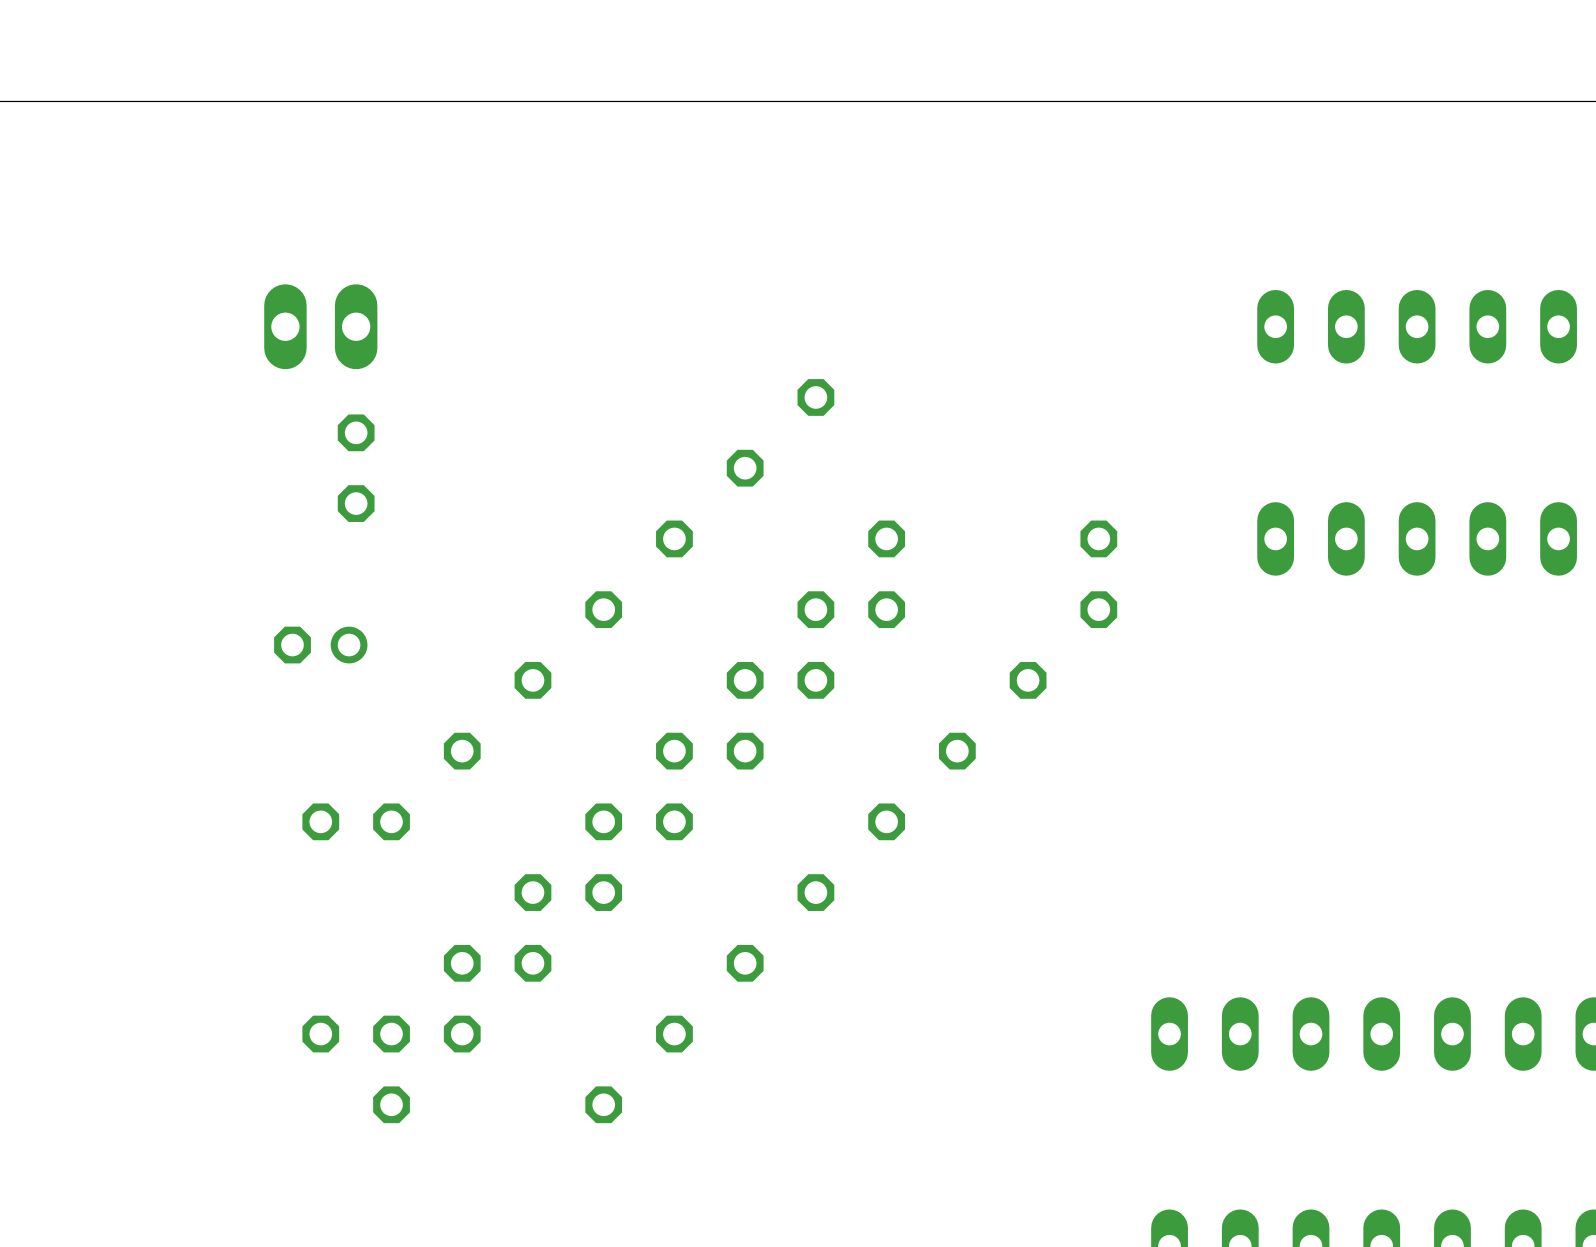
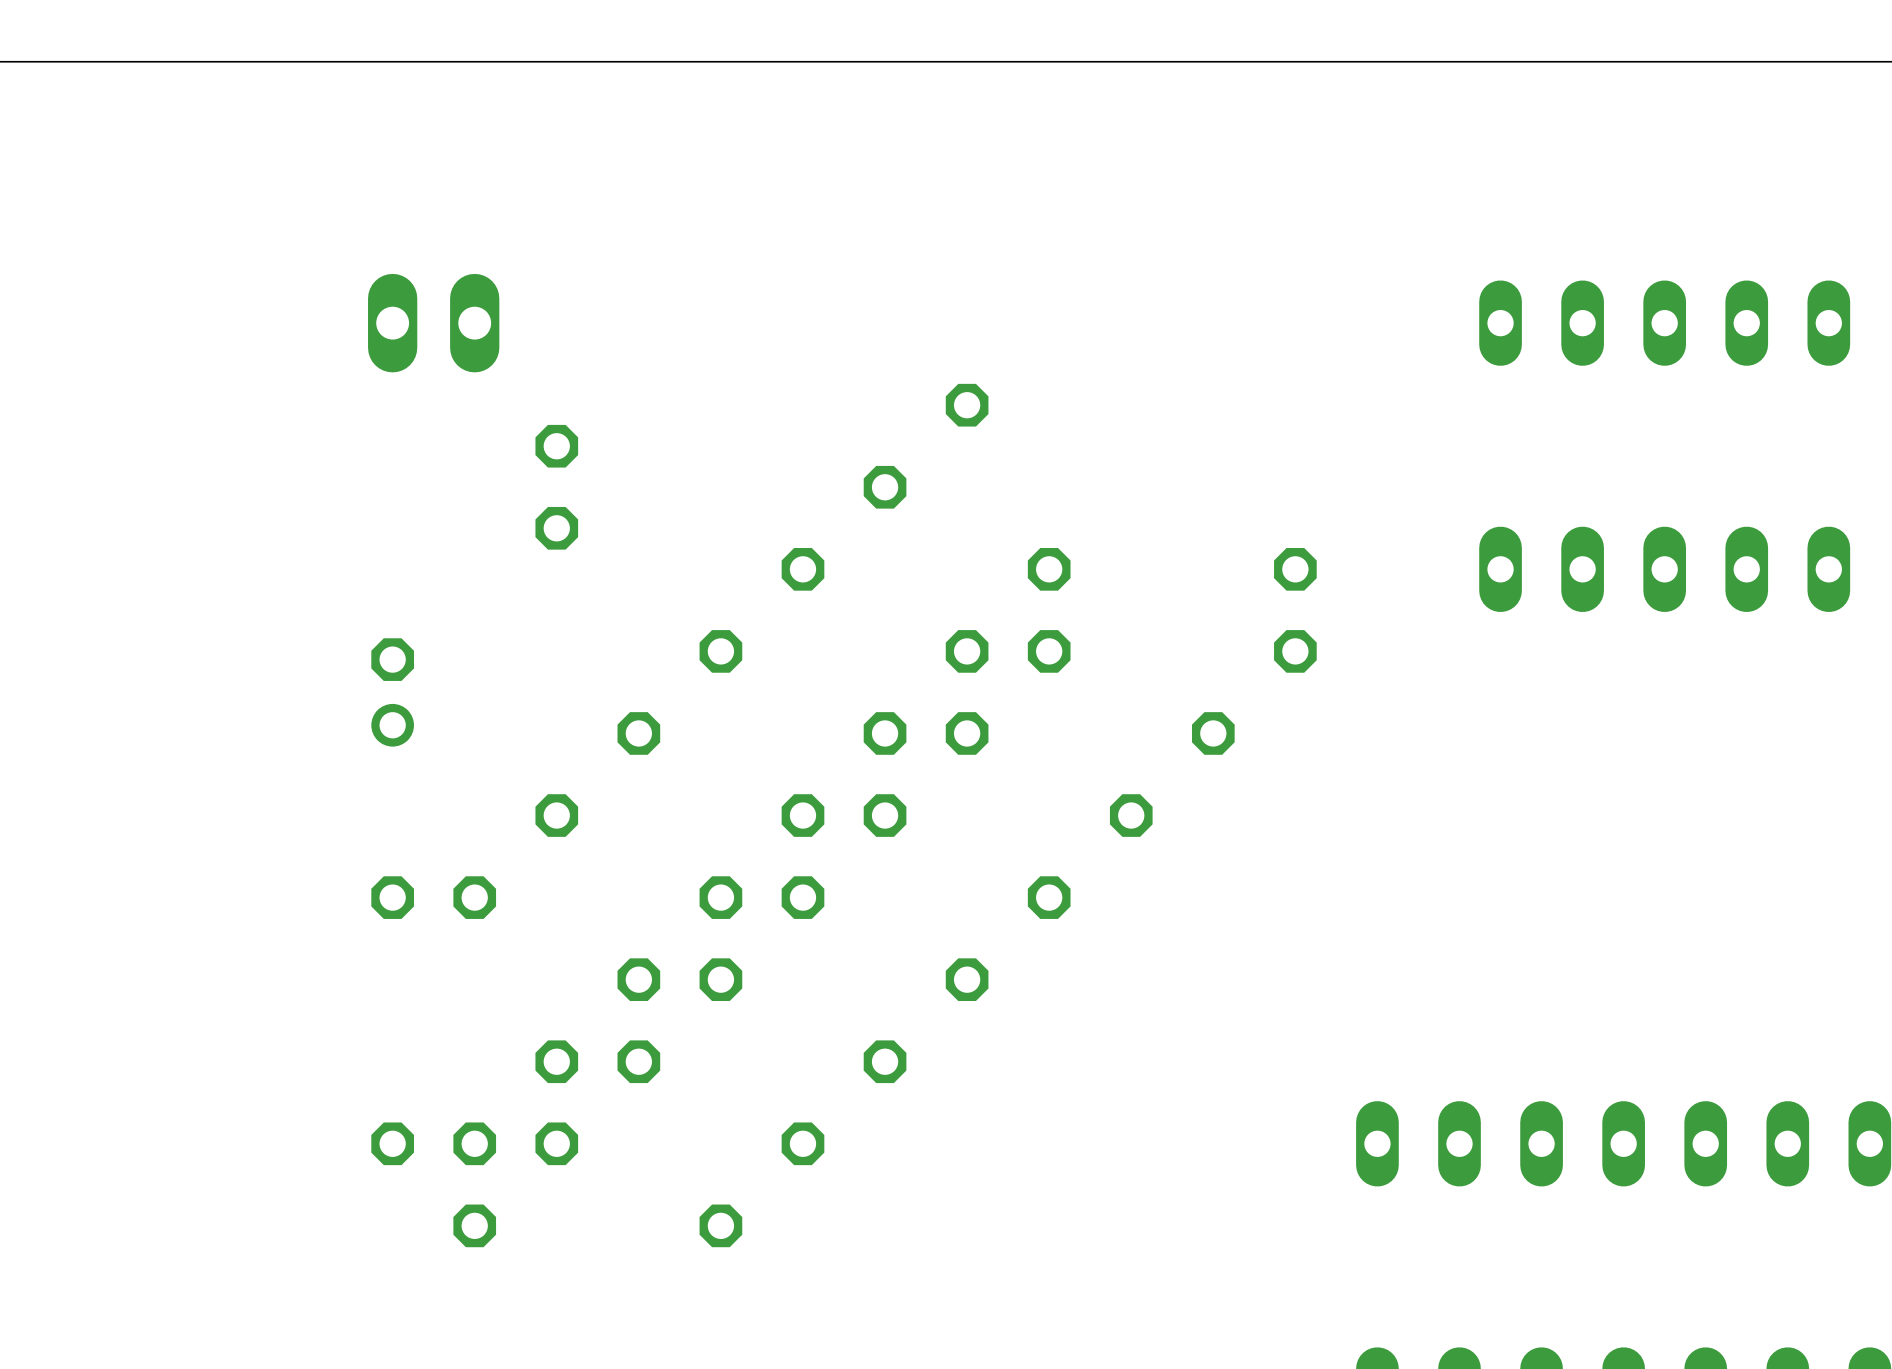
part position: (320, 326) -> (433, 323)
part position: (356, 468) -> (556, 487)
part rotation: 0° (320, 645) -> 90° clockwise (392, 692)

